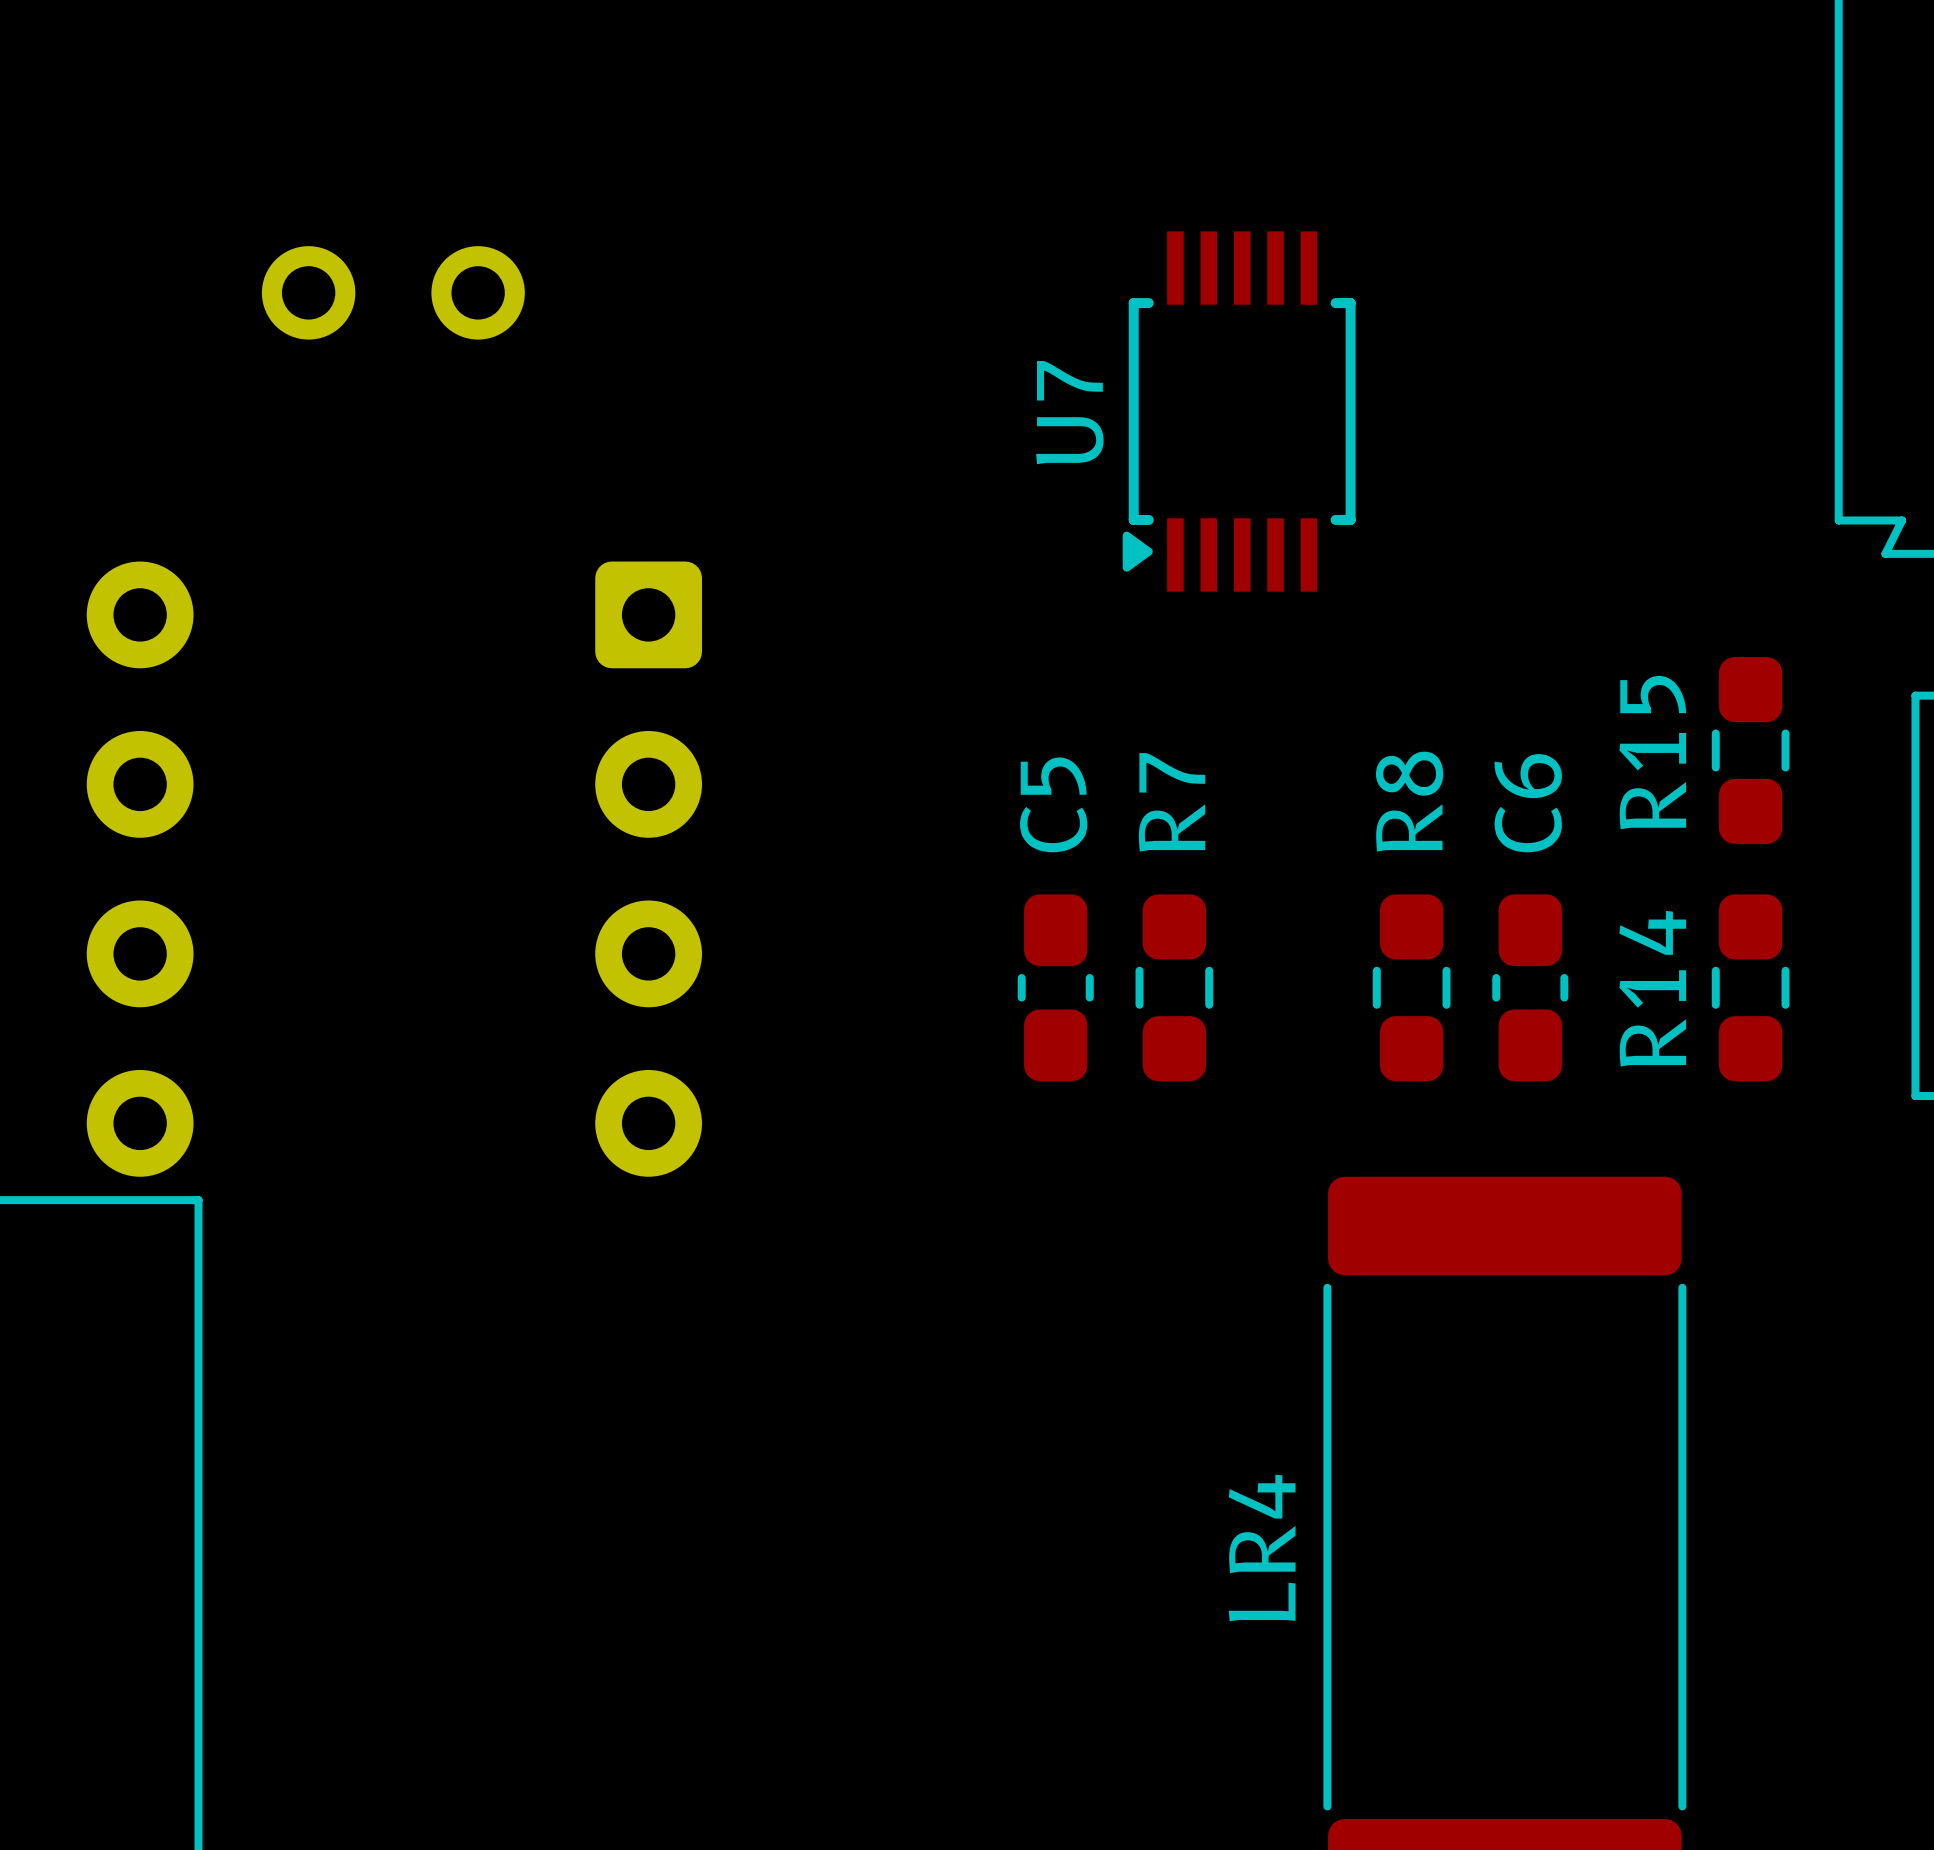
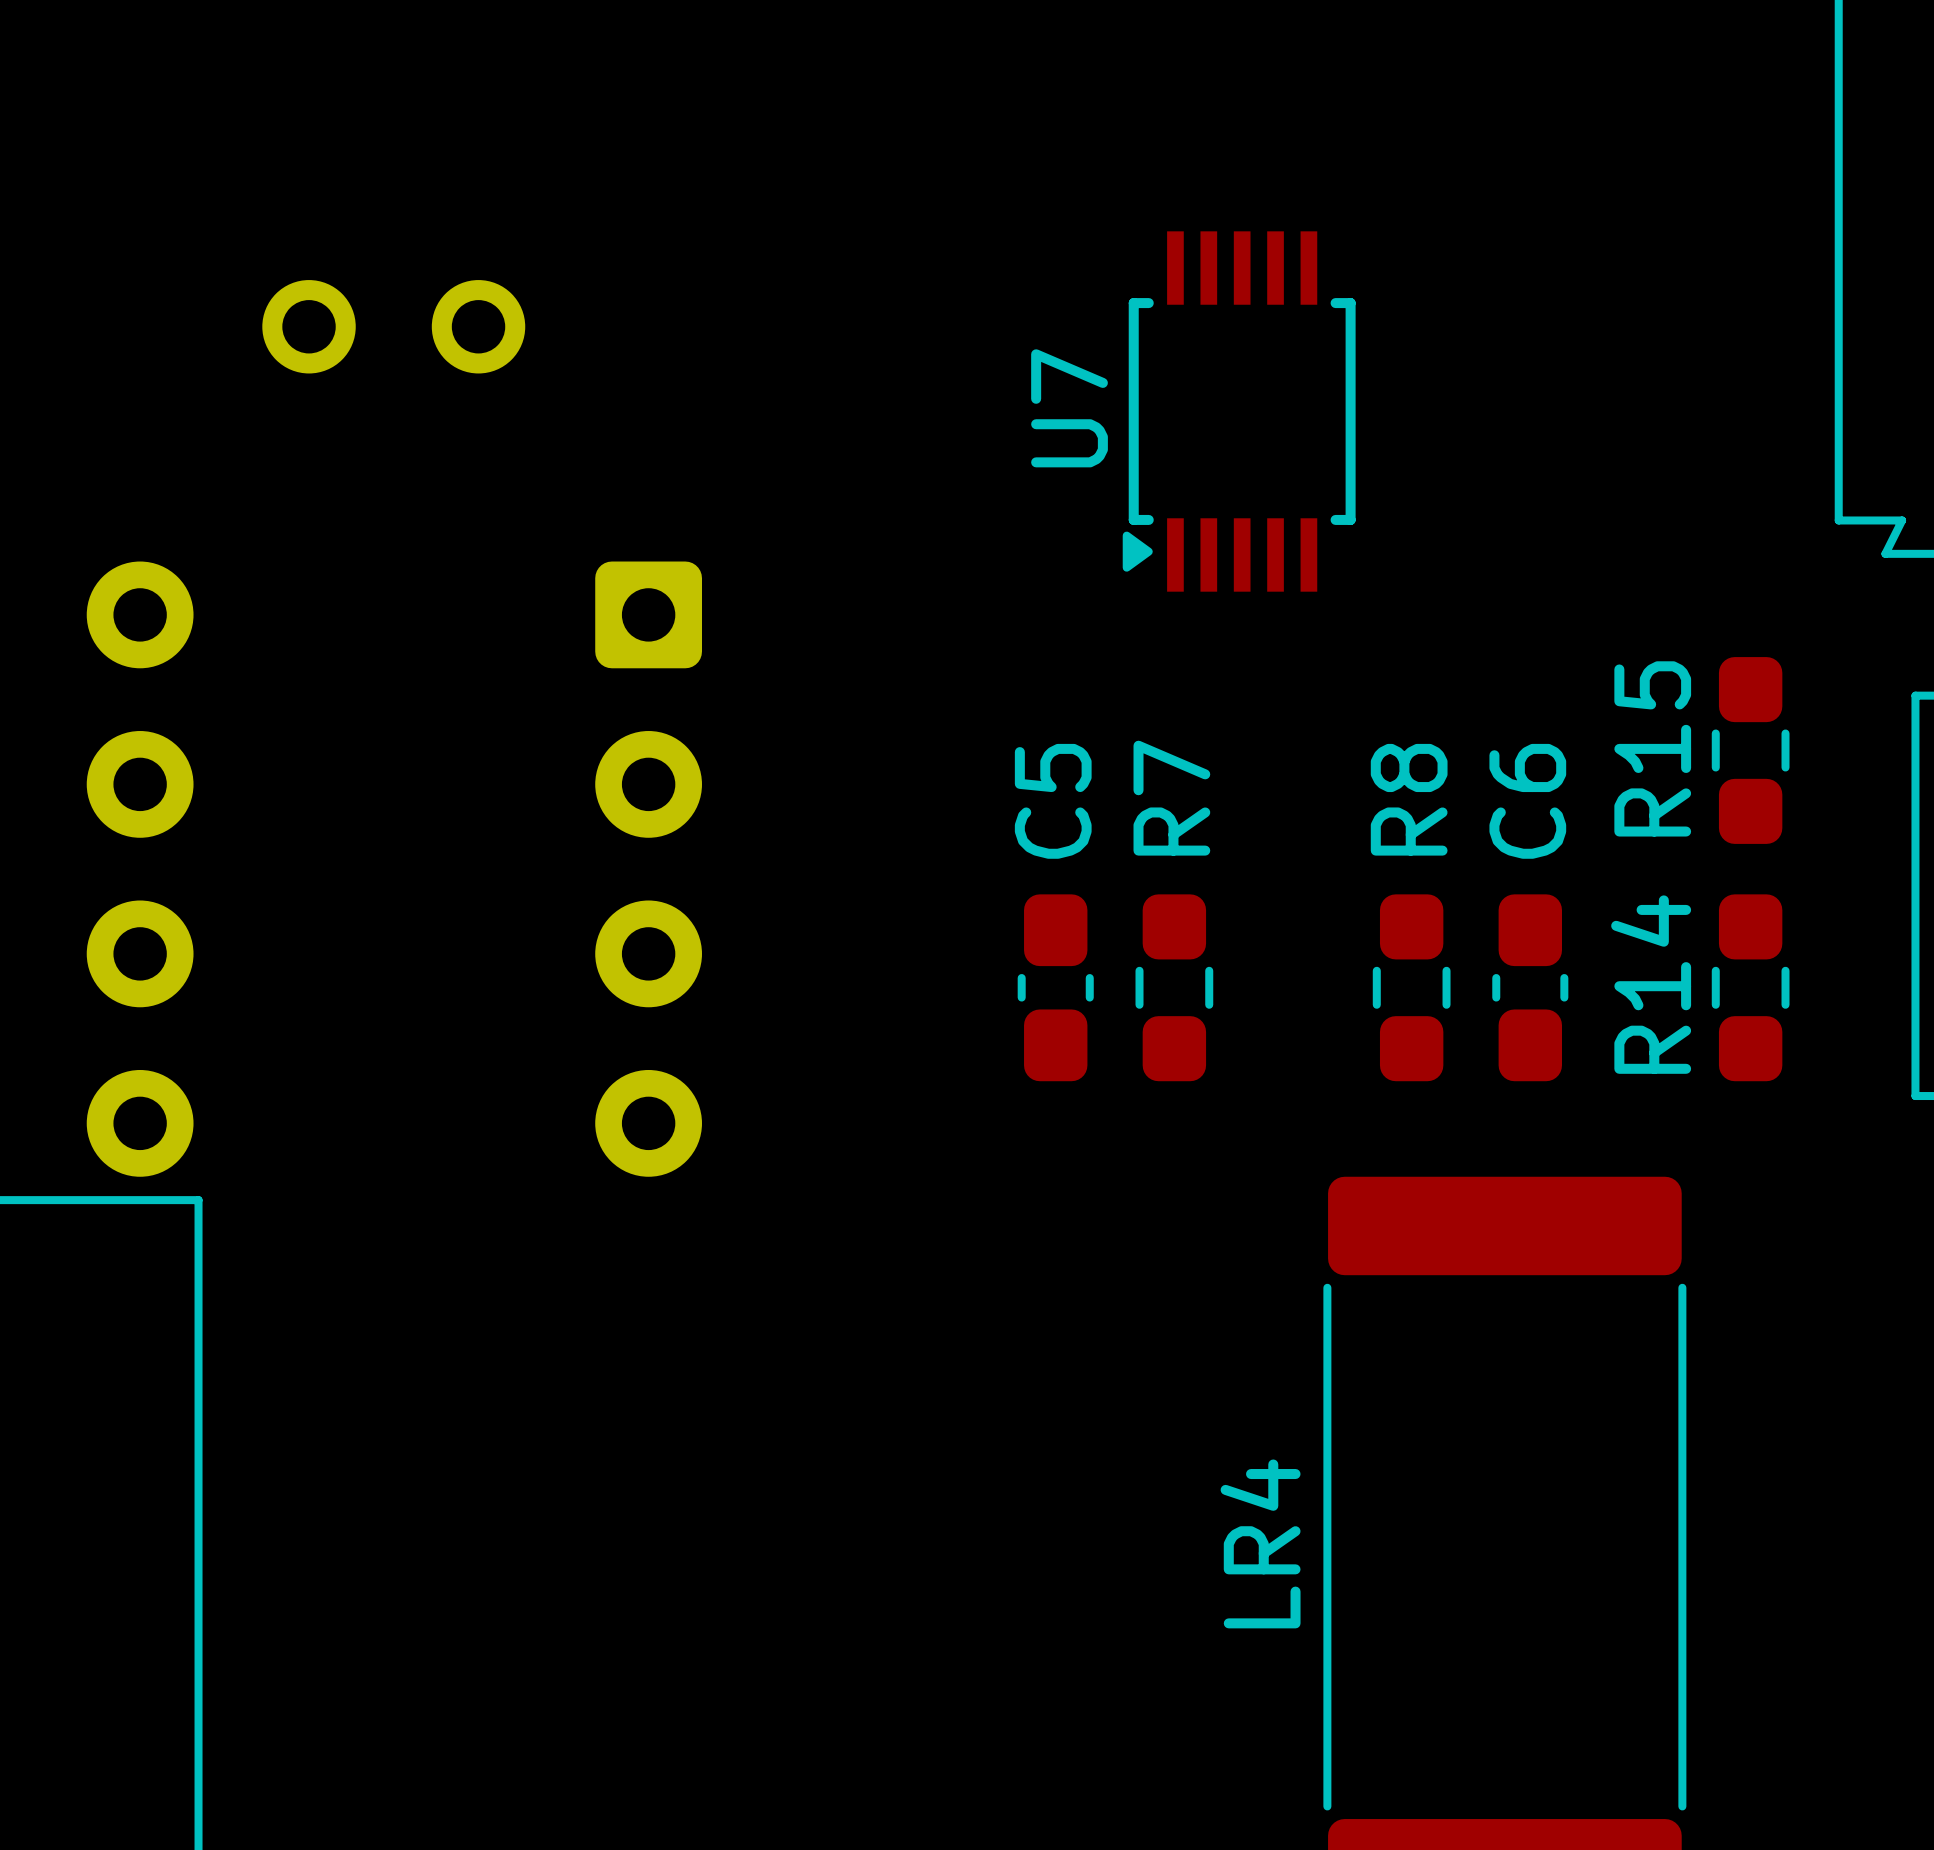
part position: (393, 292) -> (393, 326)

